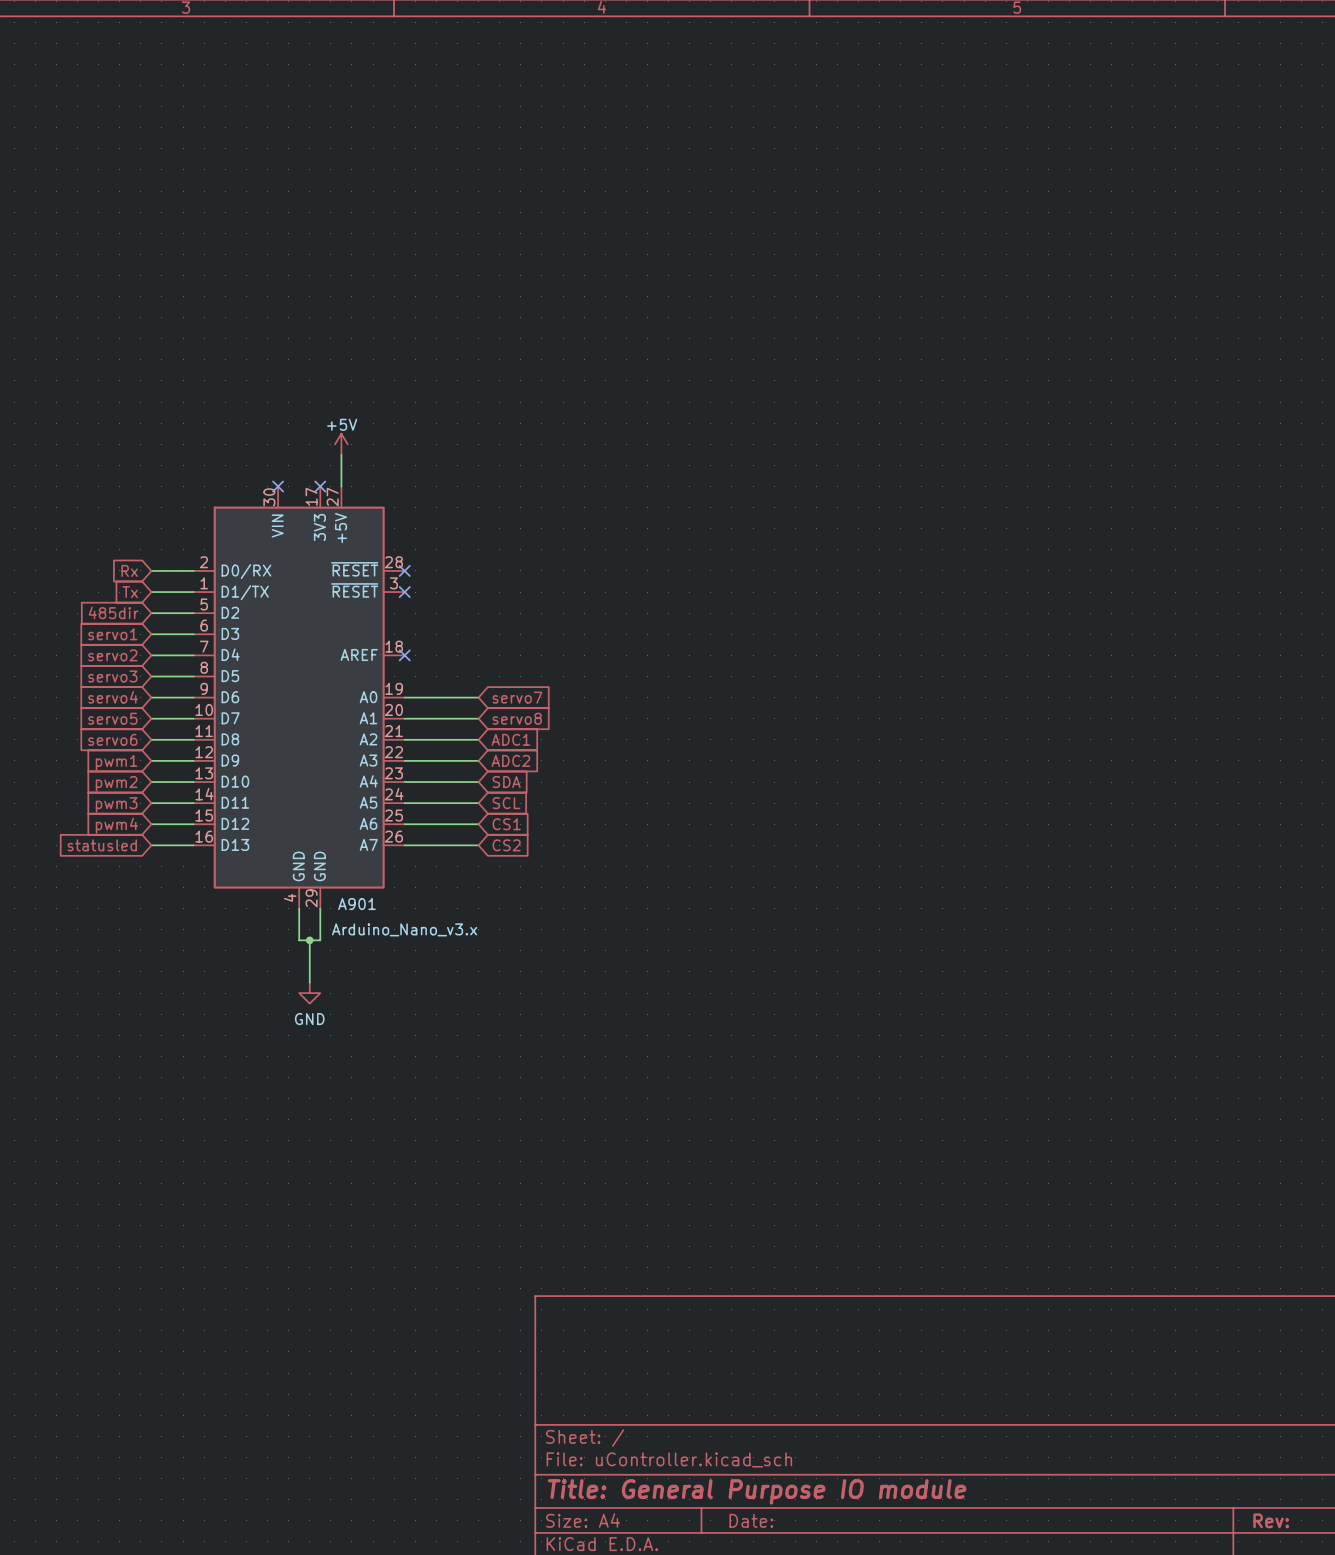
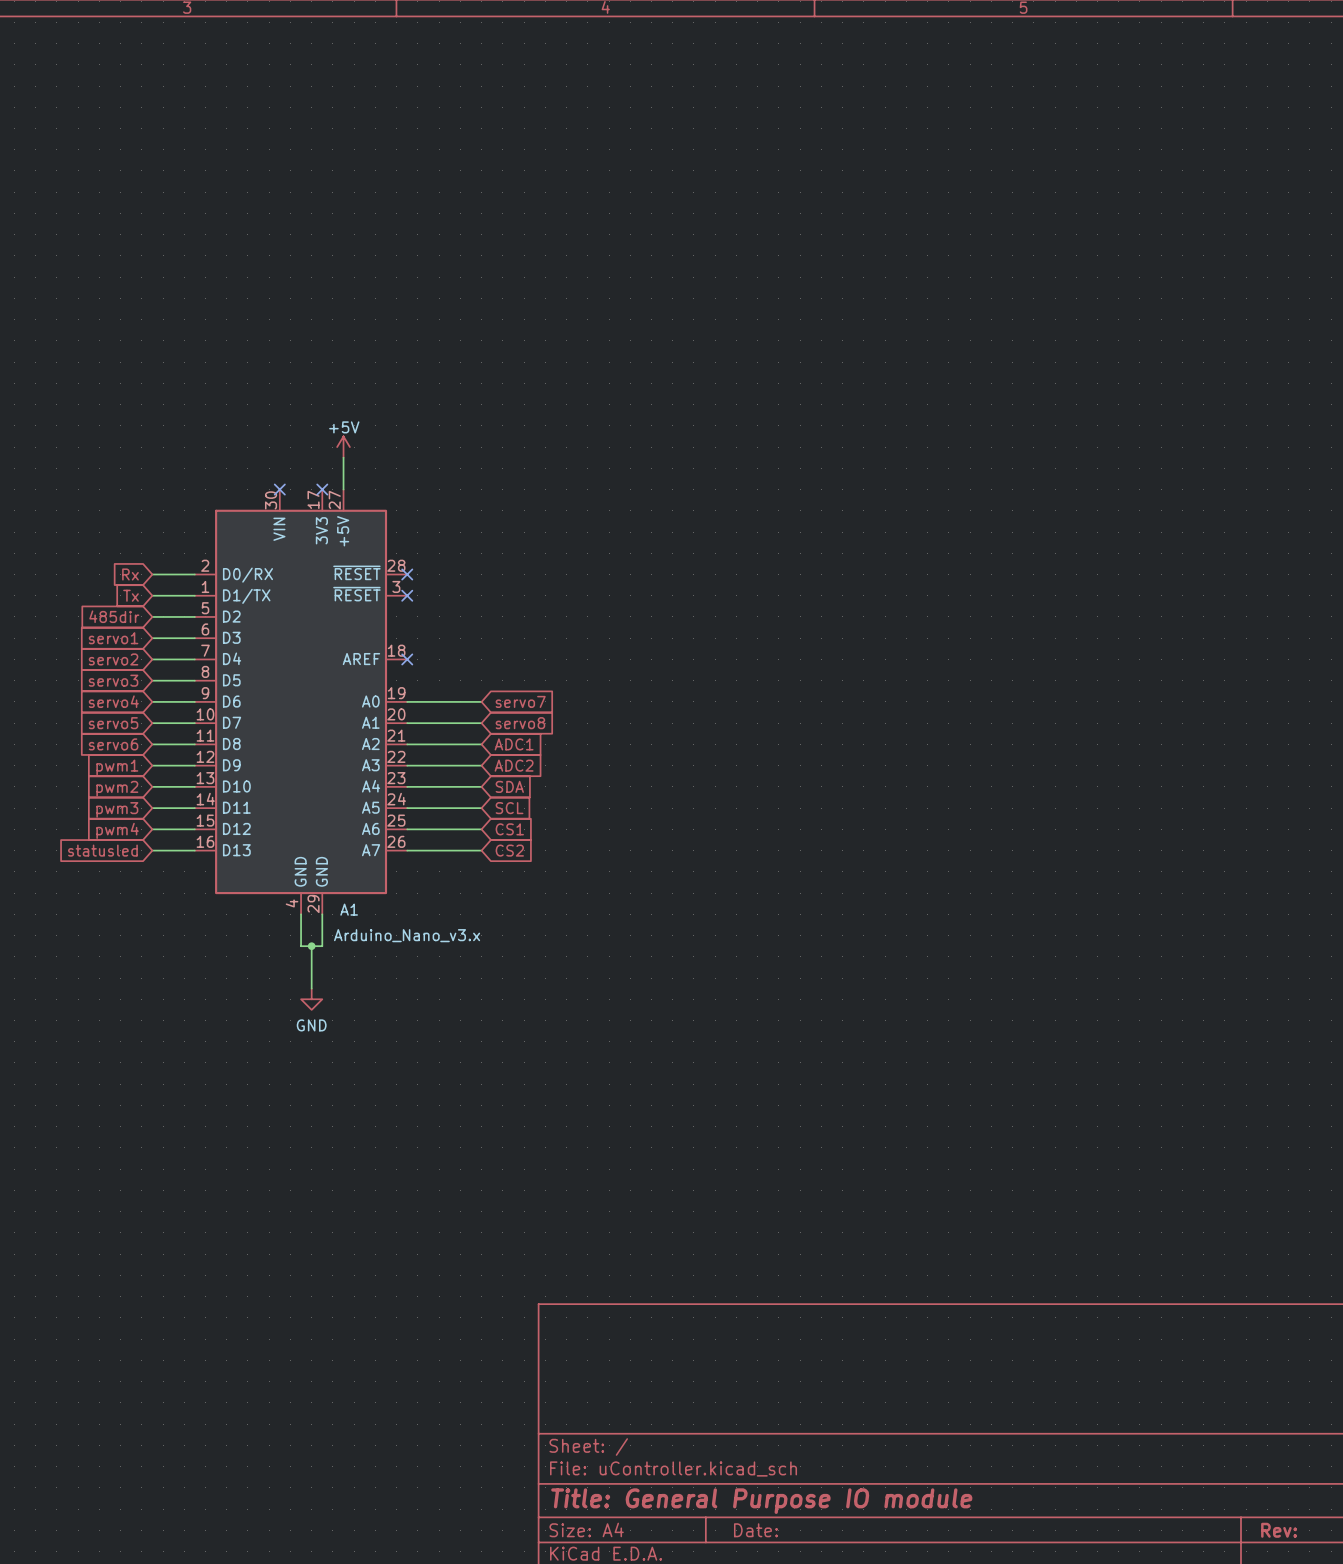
A901 name: A901 (357, 904) -> A1 (349, 909)

